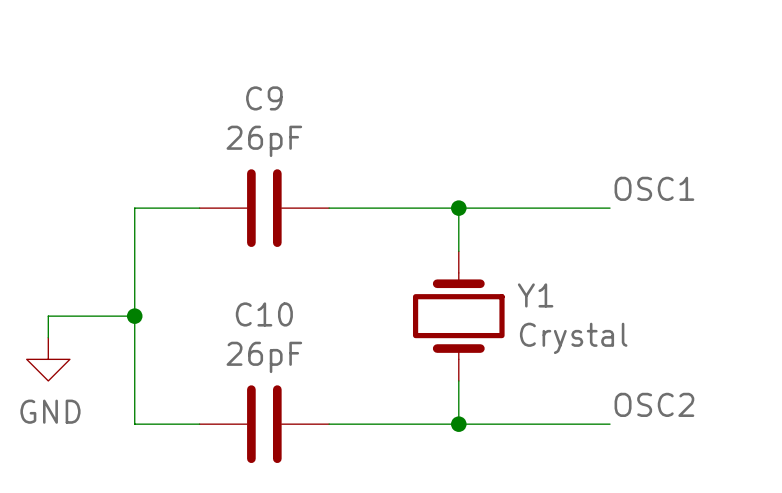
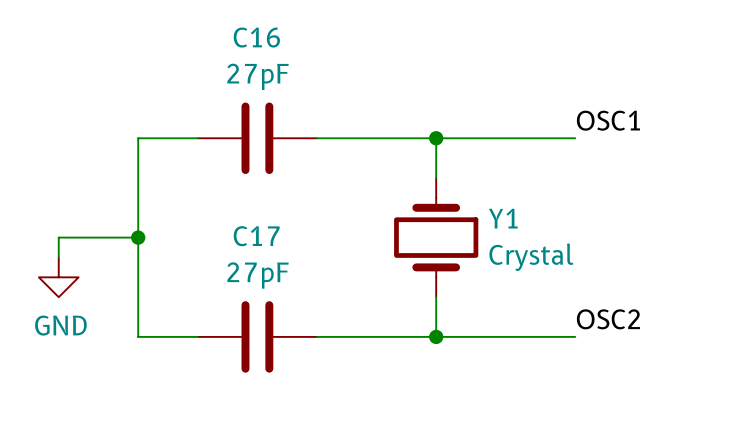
C9 name: C9 (264, 98) -> C16 (256, 37)
C9 value: 26pF (264, 141) -> 27pF (258, 76)
C10 name: C10 (264, 314) -> C17 (256, 236)
C10 value: 26pF (264, 357) -> 27pF (258, 275)

